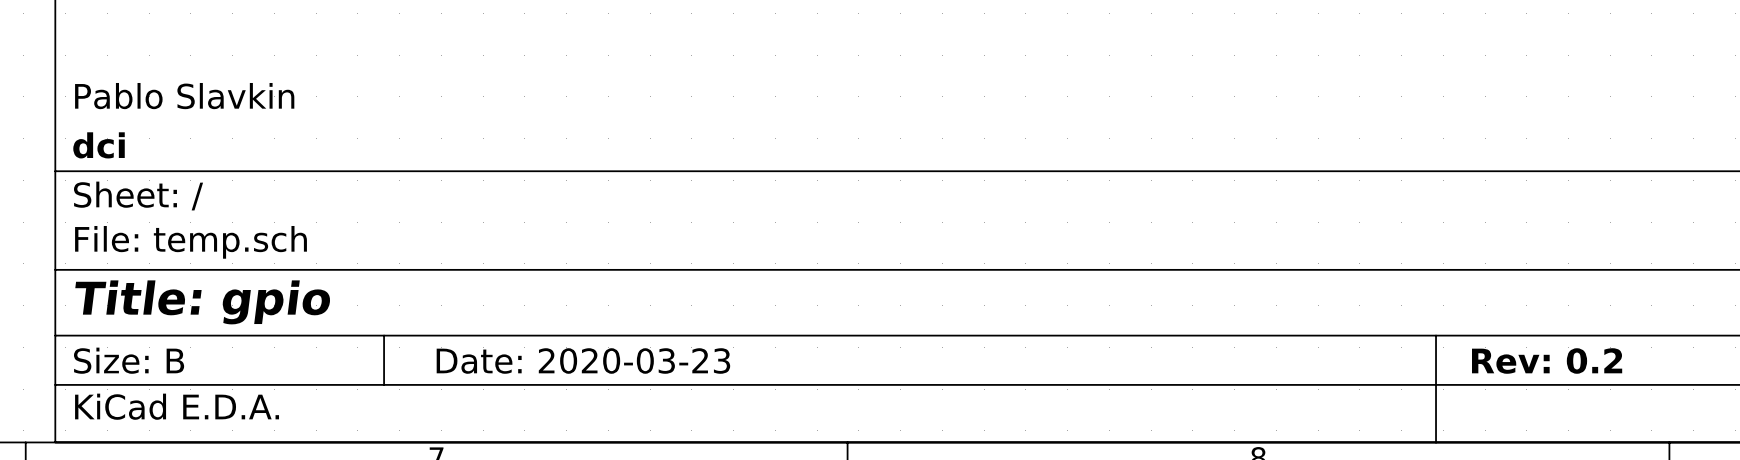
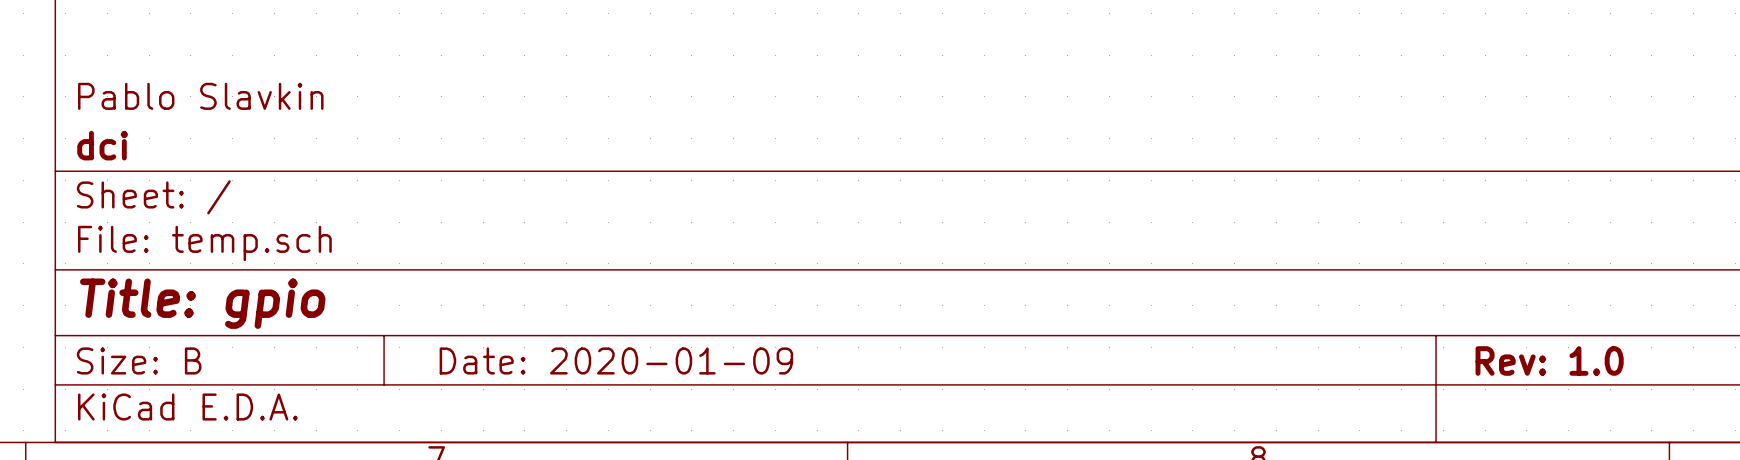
title block: Date: 2020-03-23 (583, 361) -> Date: 2020-01-09 (616, 360)
title block: Rev: 0.2 (1547, 361) -> Rev: 1.0 (1549, 360)

